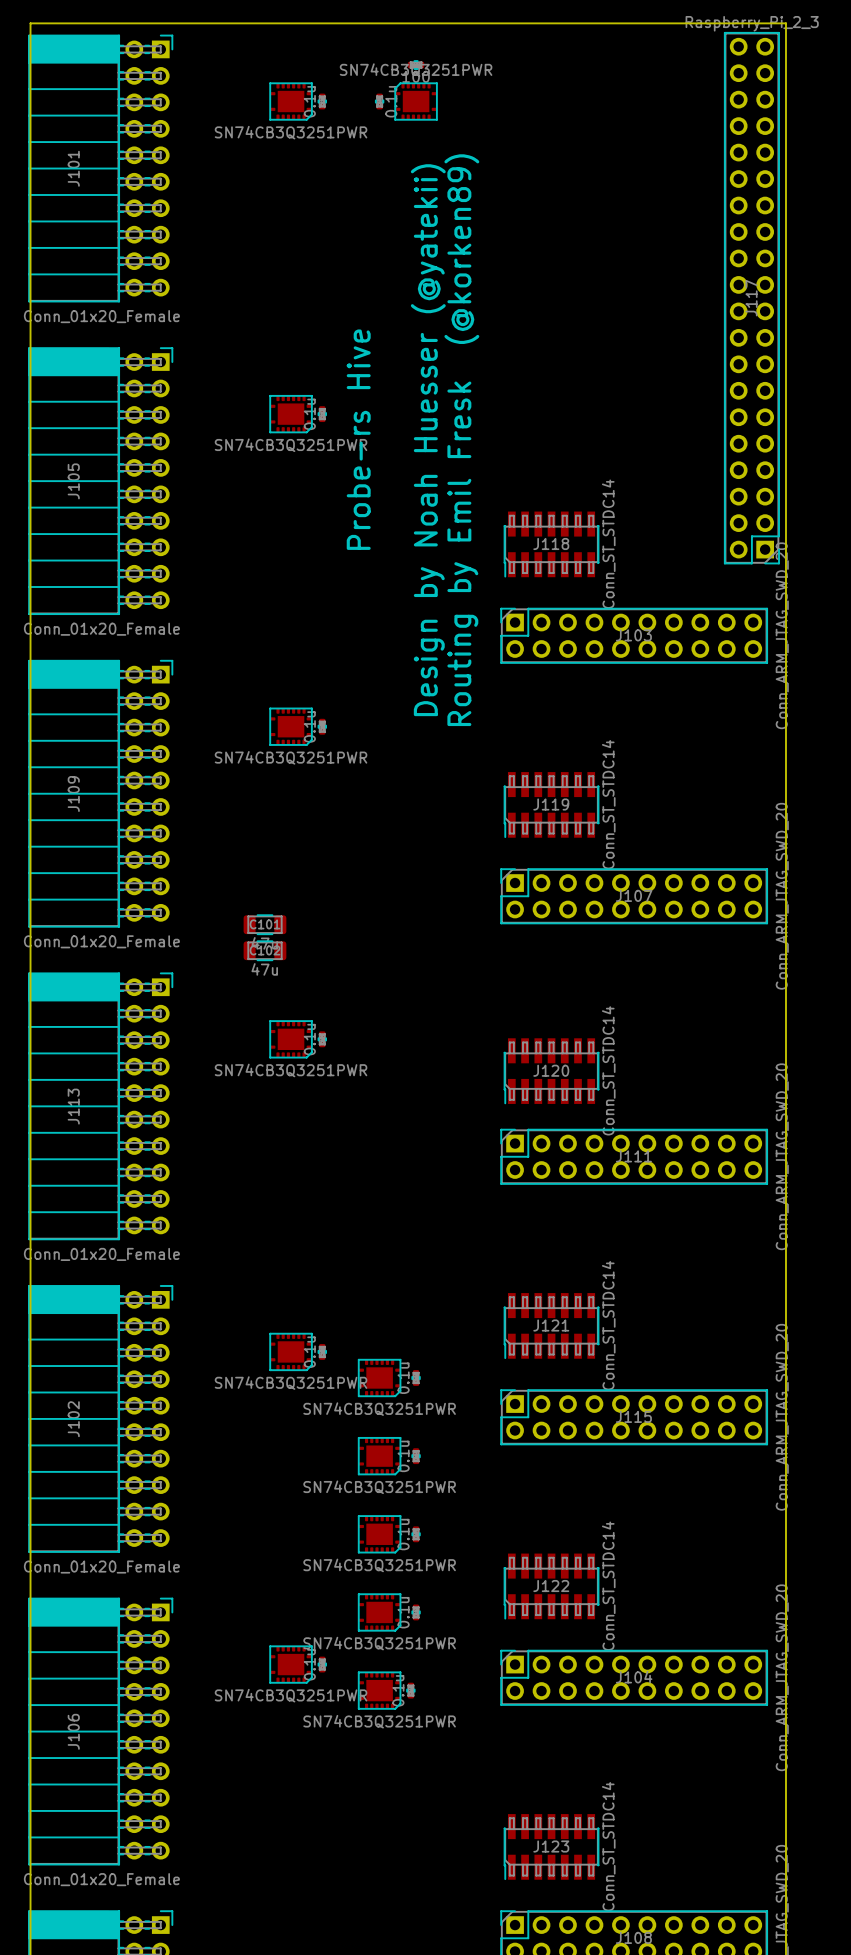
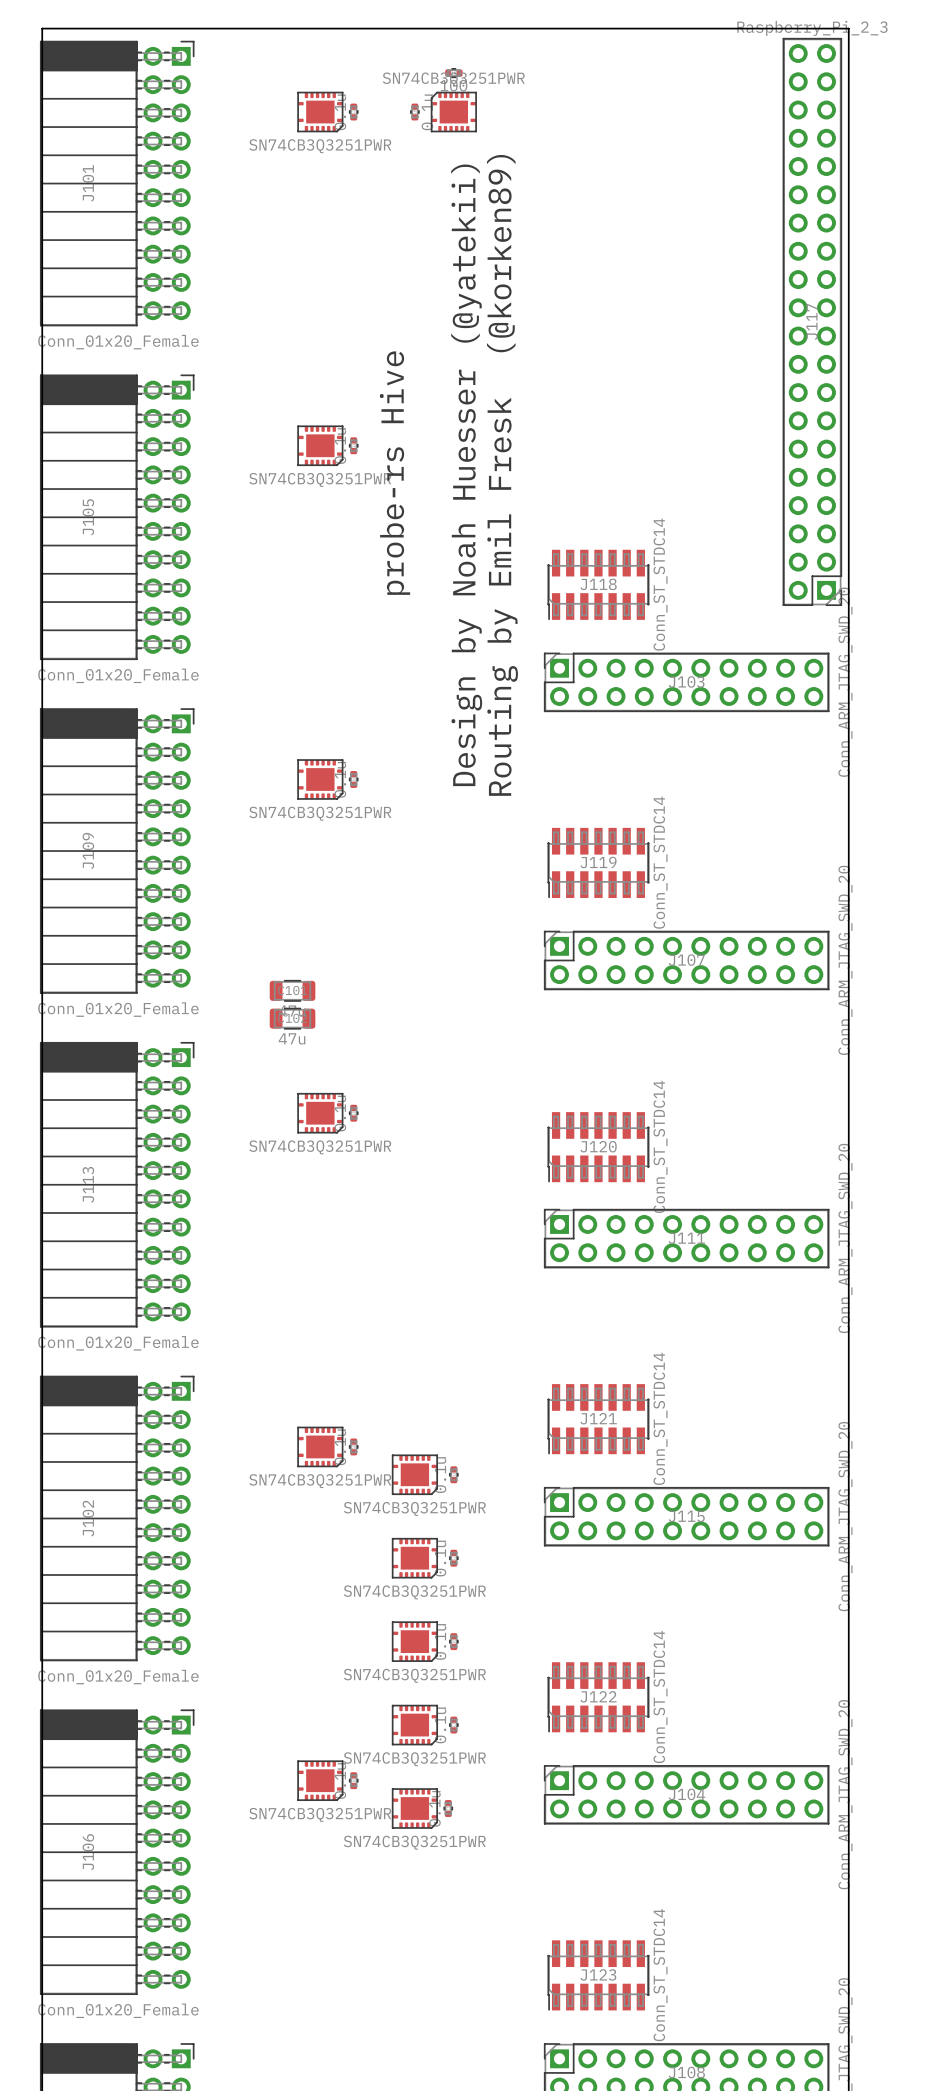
text: Probe-rs Hive (358, 439) -> probe-rs Hive (394, 473)

